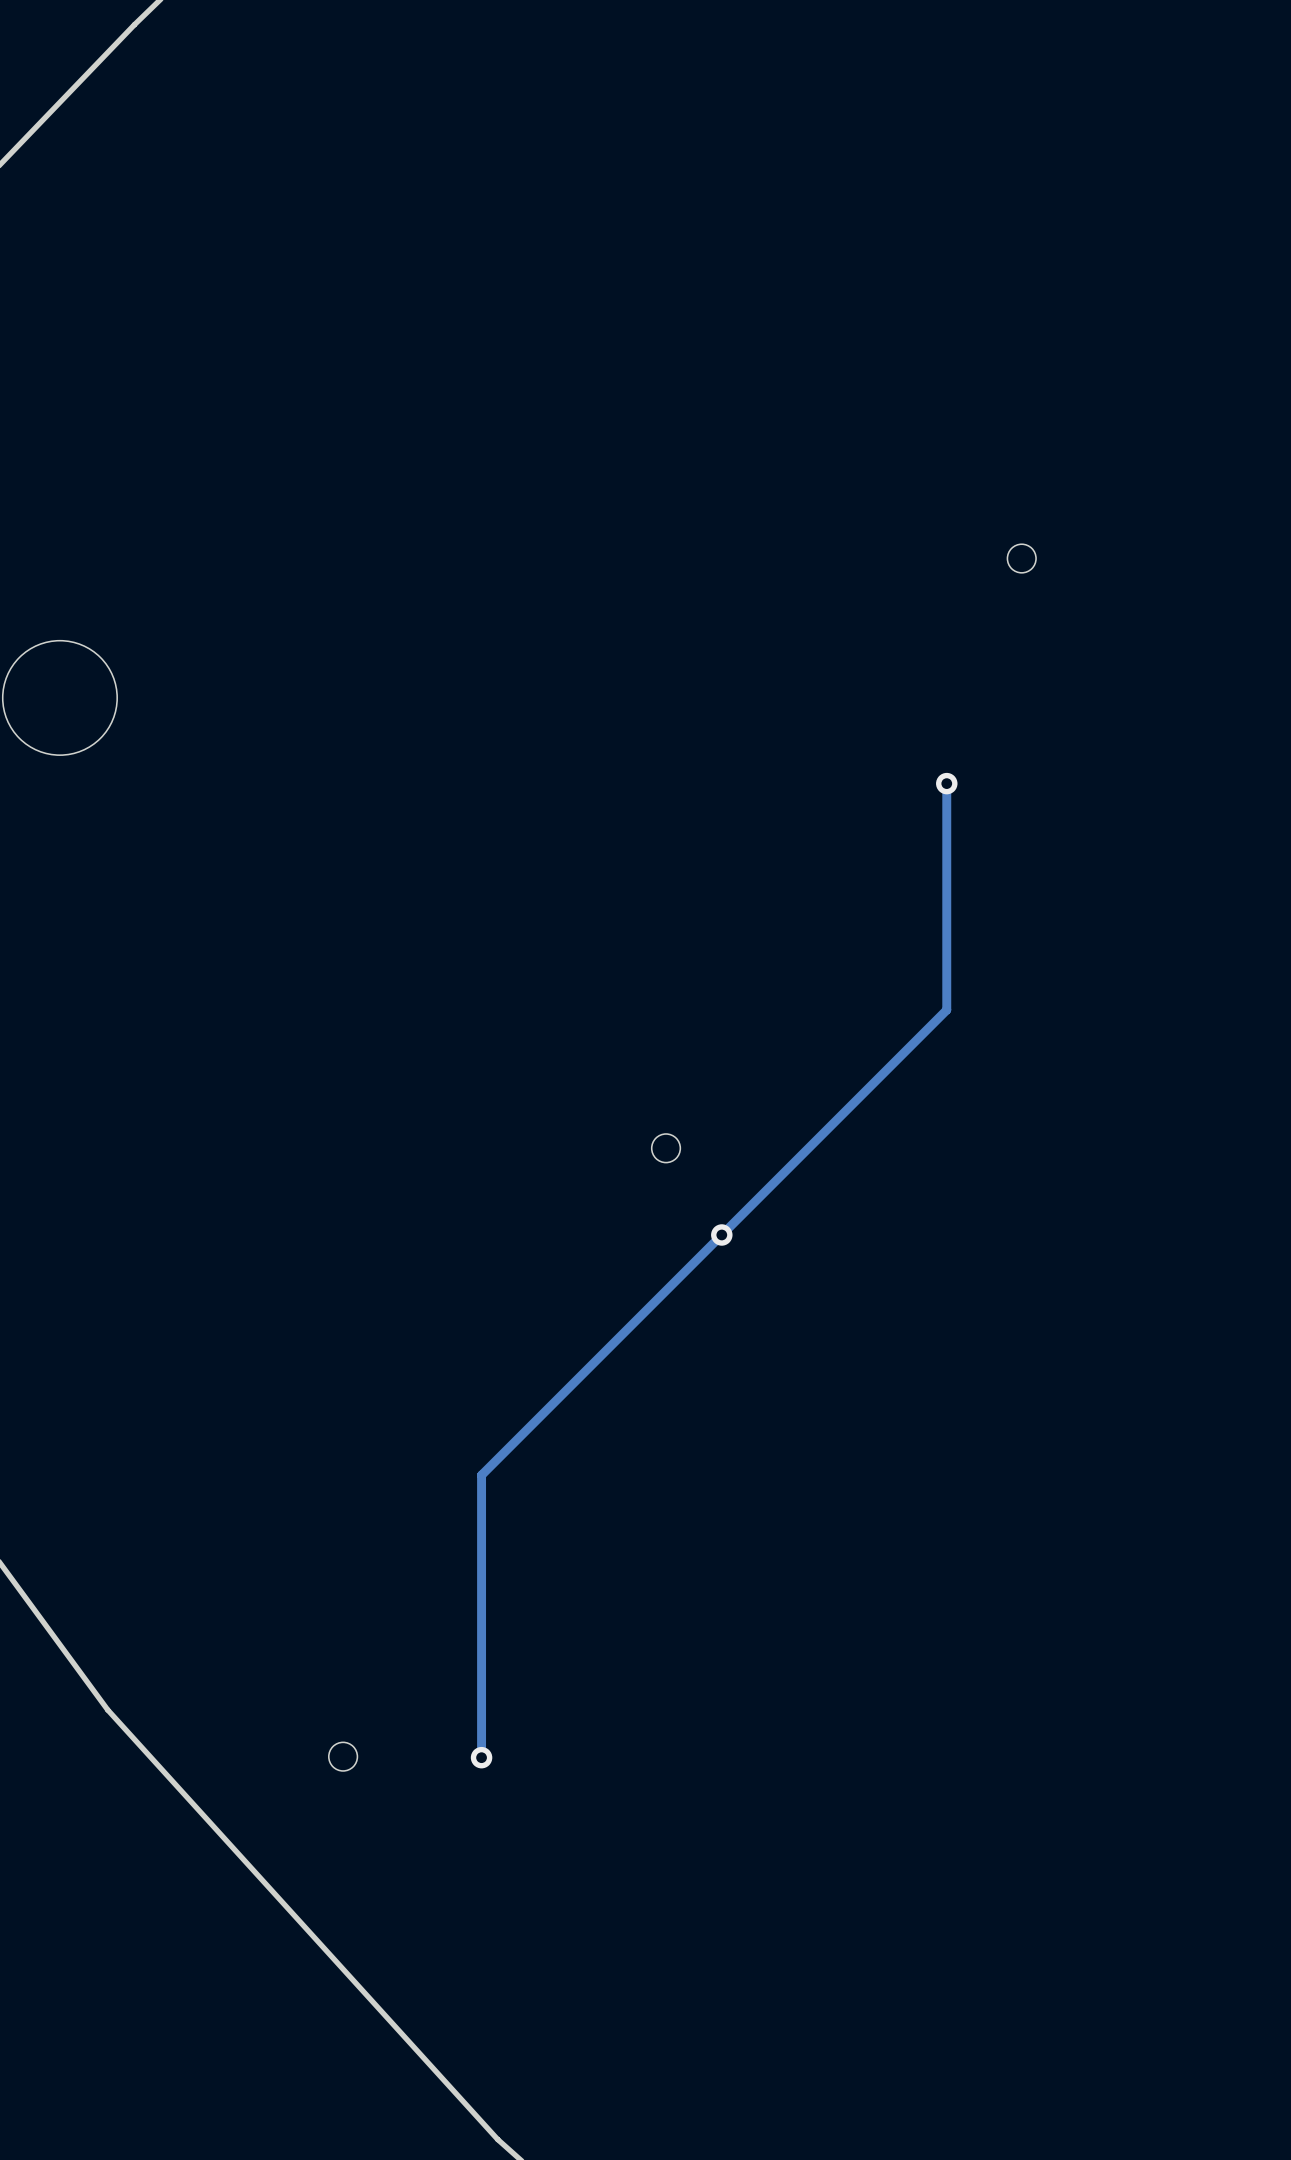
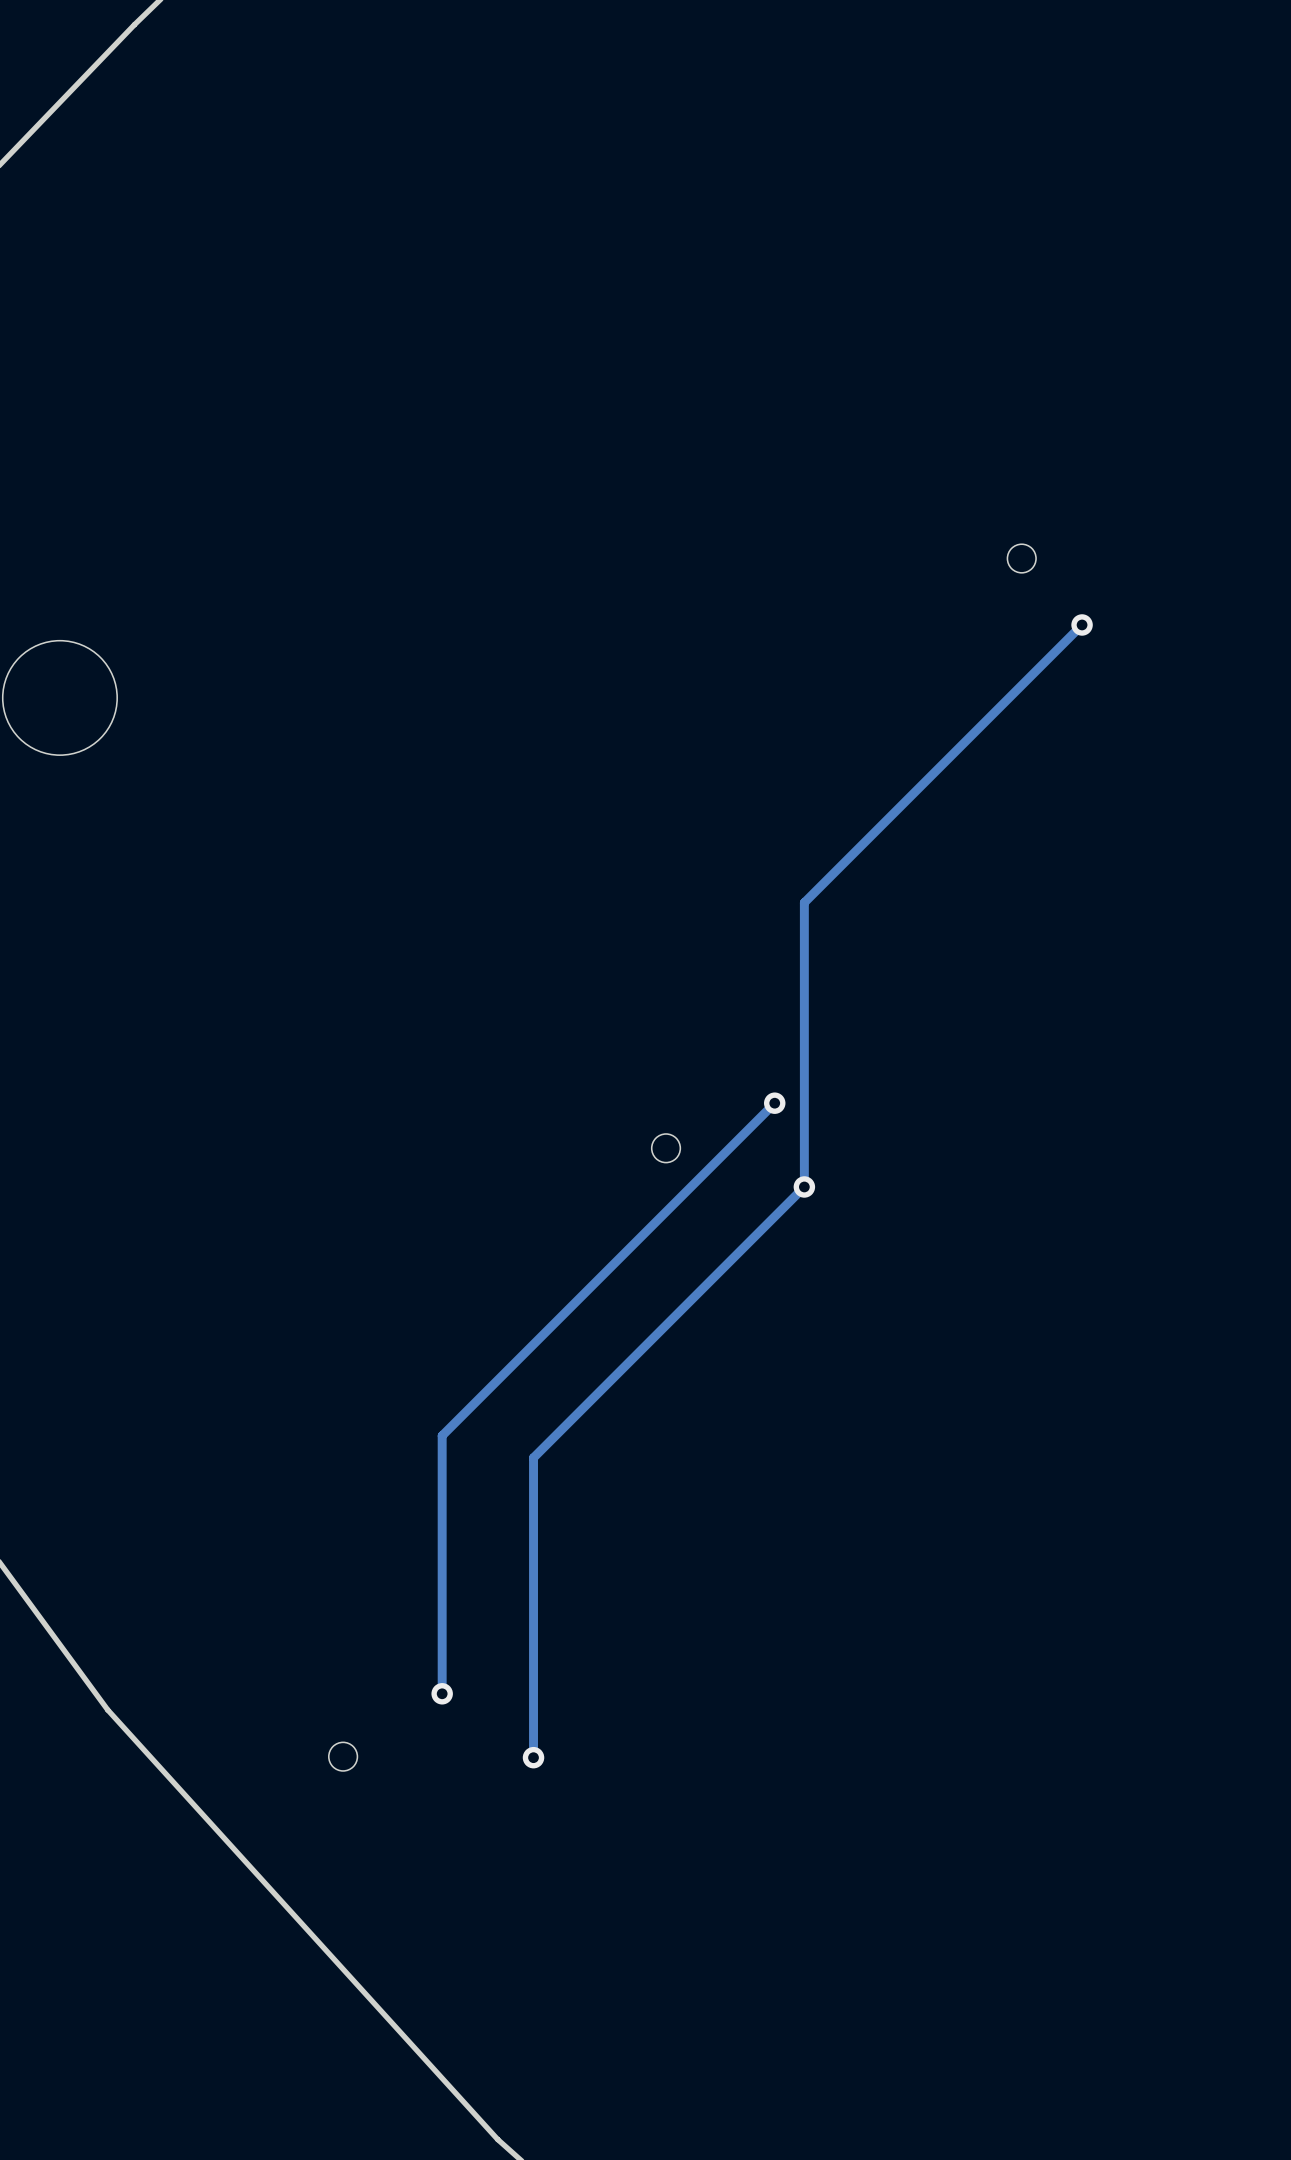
track: none -> (1082, 624) (804, 902) (804, 1186) (533, 1457) (533, 1757)
via: none -> (1082, 624)
track: (946, 783) (946, 1010) (481, 1475) (481, 1757) -> none
via: (946, 783) -> none
track: none -> (774, 1103) (442, 1435) (442, 1693)
via: none -> (774, 1103)
via: none -> (804, 1186)
via: (721, 1234) -> none
via: none -> (442, 1693)
via: (481, 1757) -> none
via: none -> (533, 1757)

